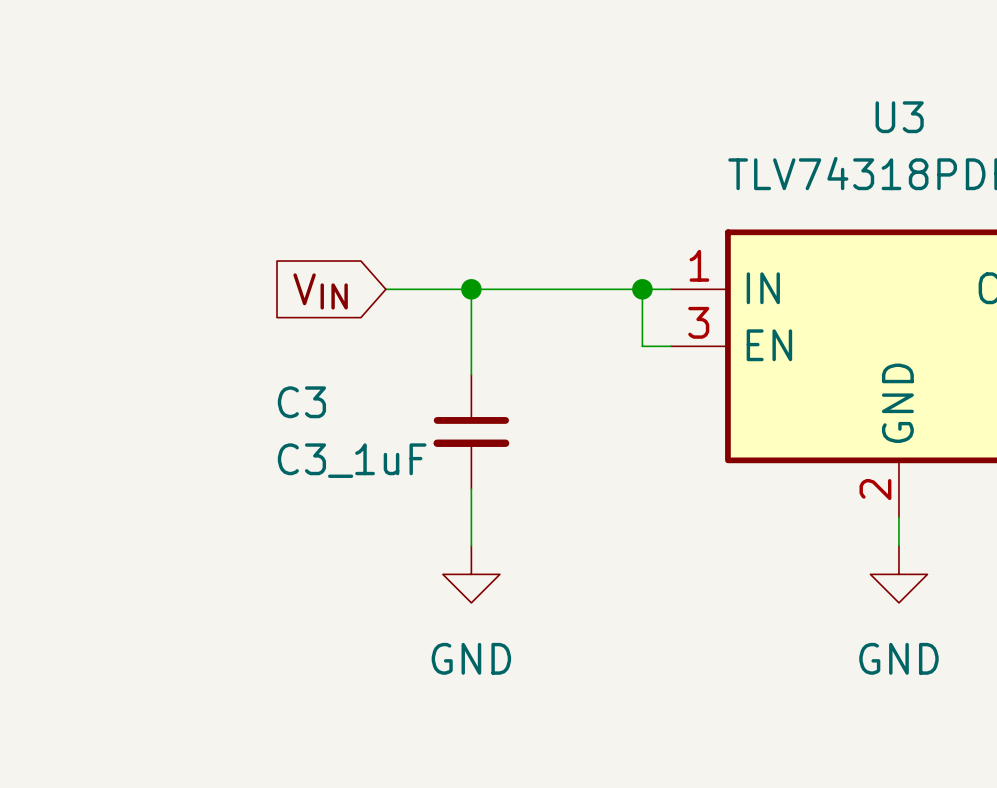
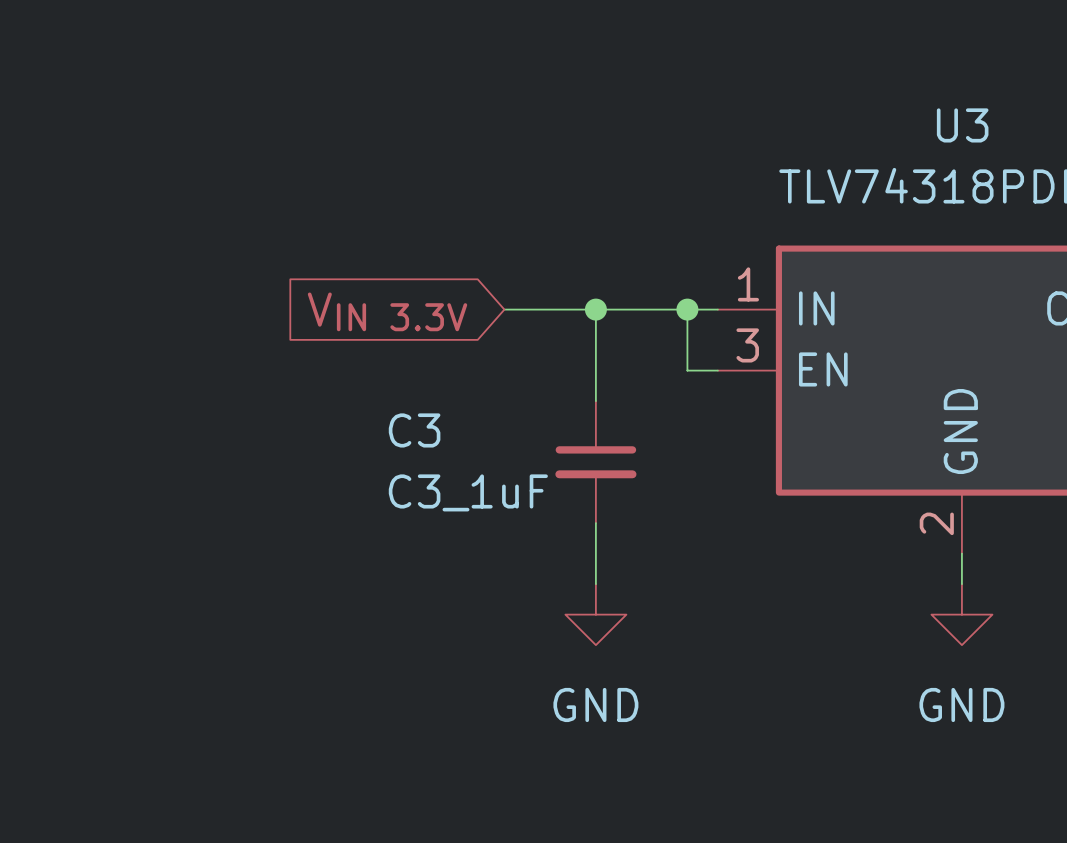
wire: (385, 289) (471, 289) (471, 374) -> none
junction position: (471, 289) -> (595, 309)
wire: none -> (595, 309) (595, 401)
global label: VIN (320, 291) -> VIN 3.3V (387, 311)
C3 position: (471, 431) -> (595, 462)
wire: (471, 488) (471, 545) -> (595, 523) (595, 584)
power symbol position: GND (471, 574) -> GND (595, 614)

